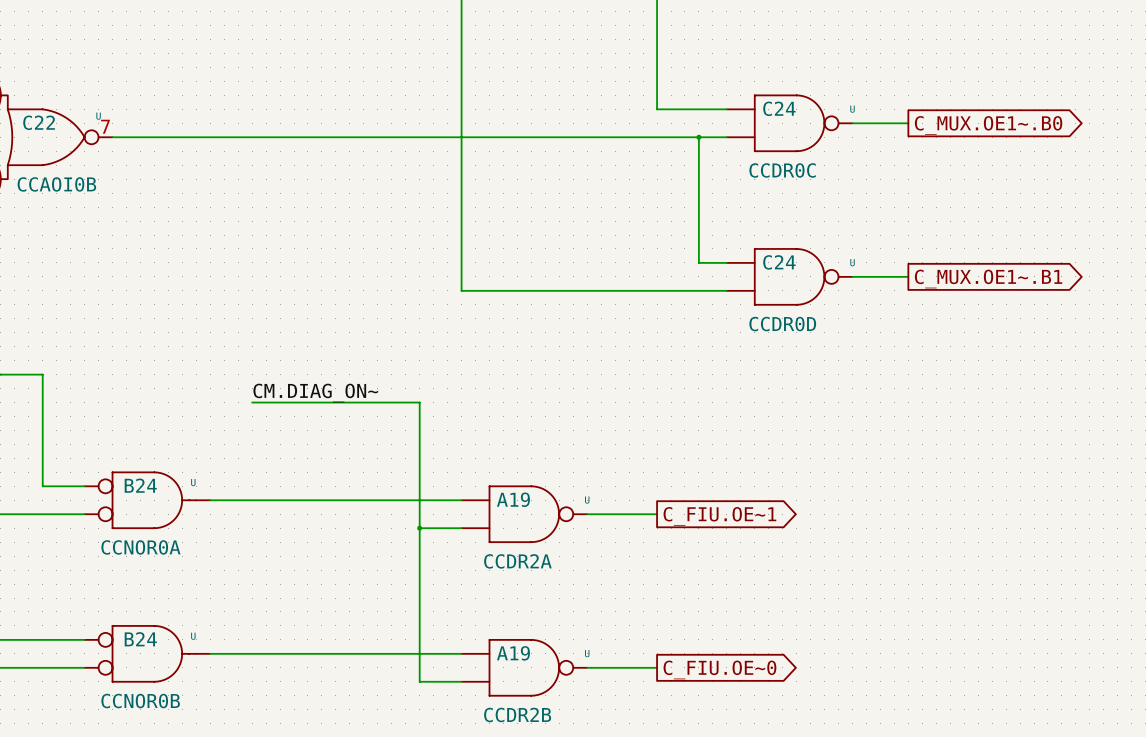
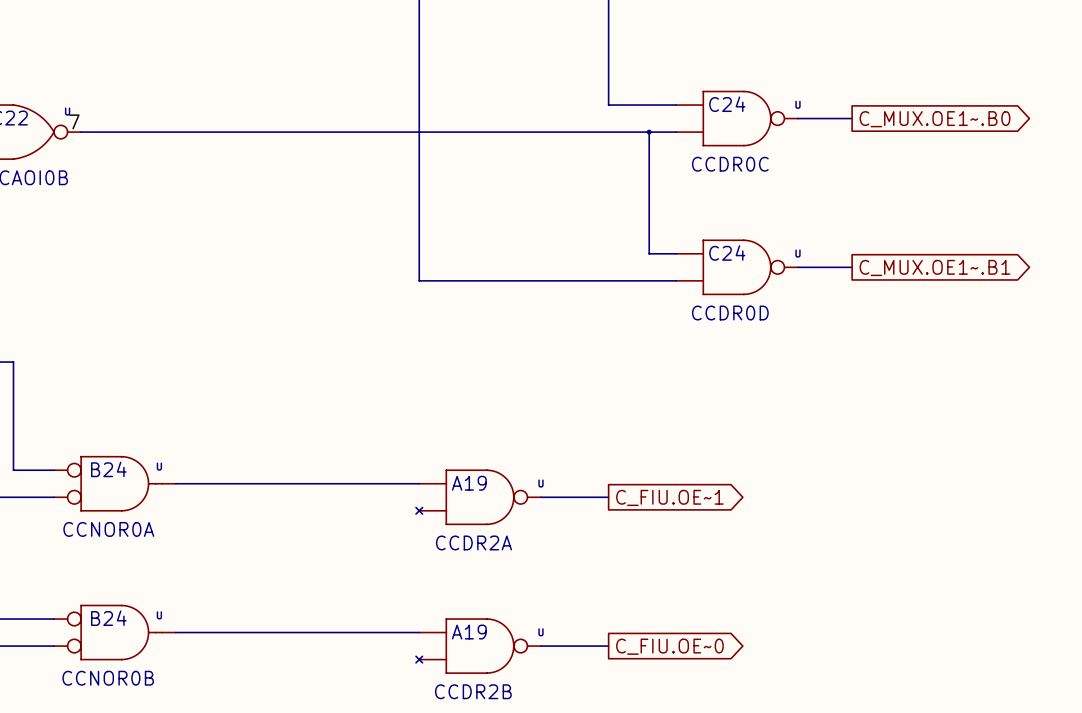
label: CM.DIAG_ON~ (315, 393) -> none
wire: (252, 402) (419, 402) (419, 681) (461, 681) -> none
wire: (419, 528) (461, 528) -> none
junction: (419, 528) -> none
no-connect mark: none -> (419, 510)
no-connect mark: none -> (419, 659)

